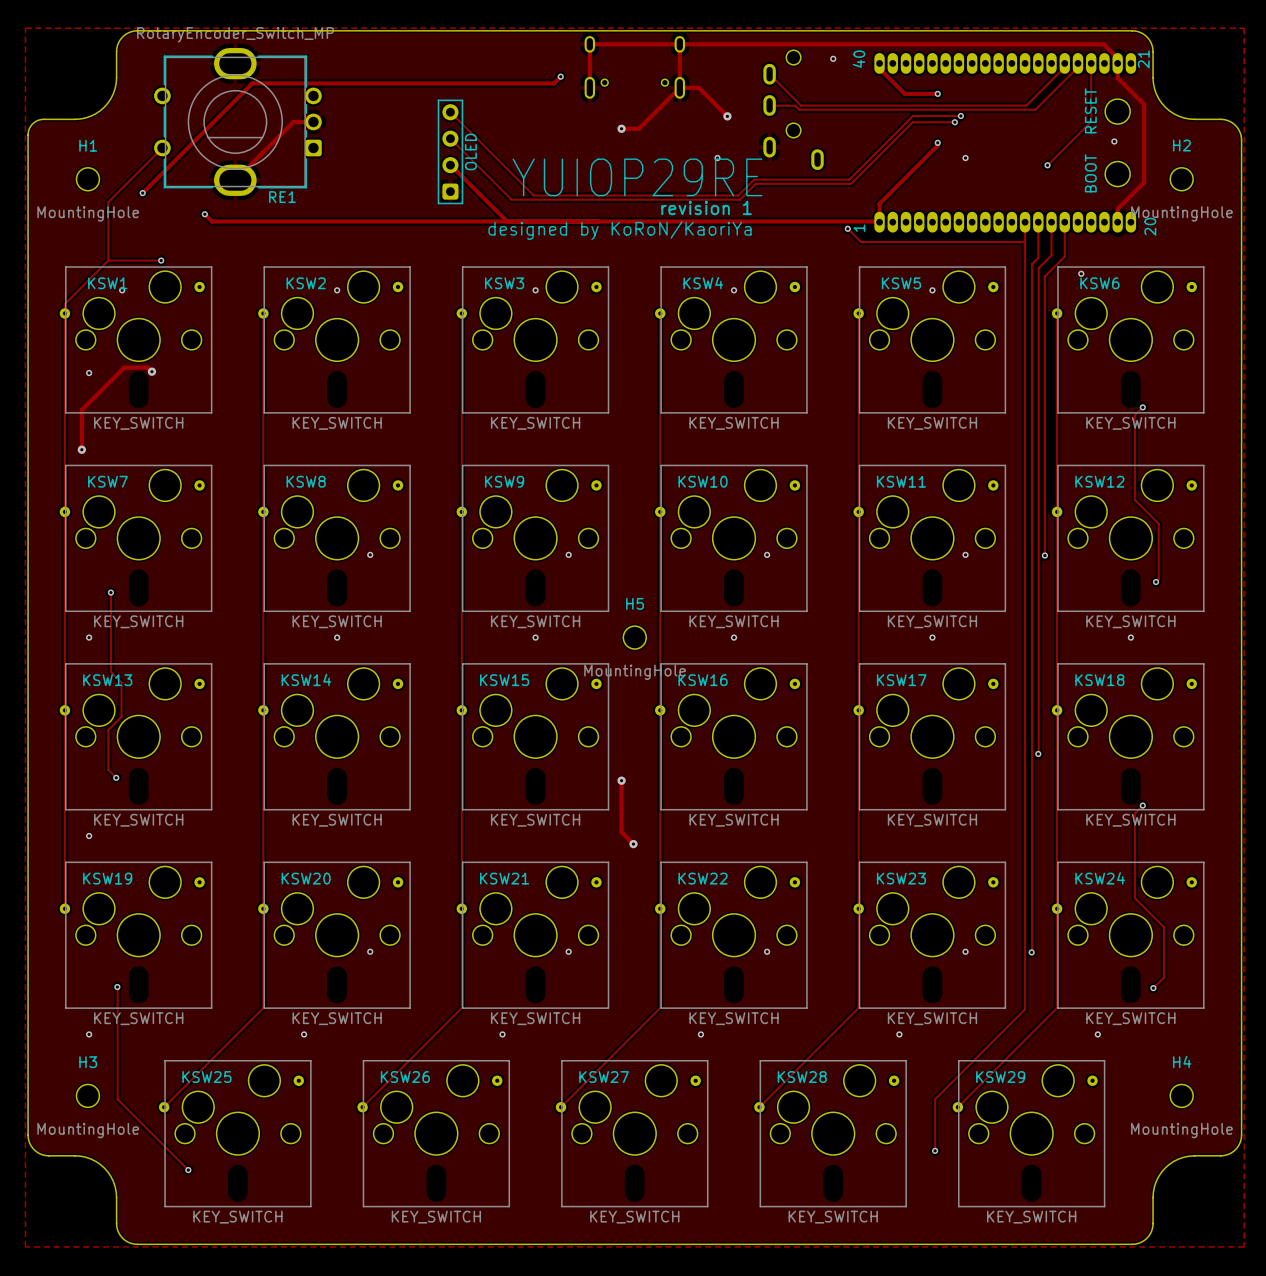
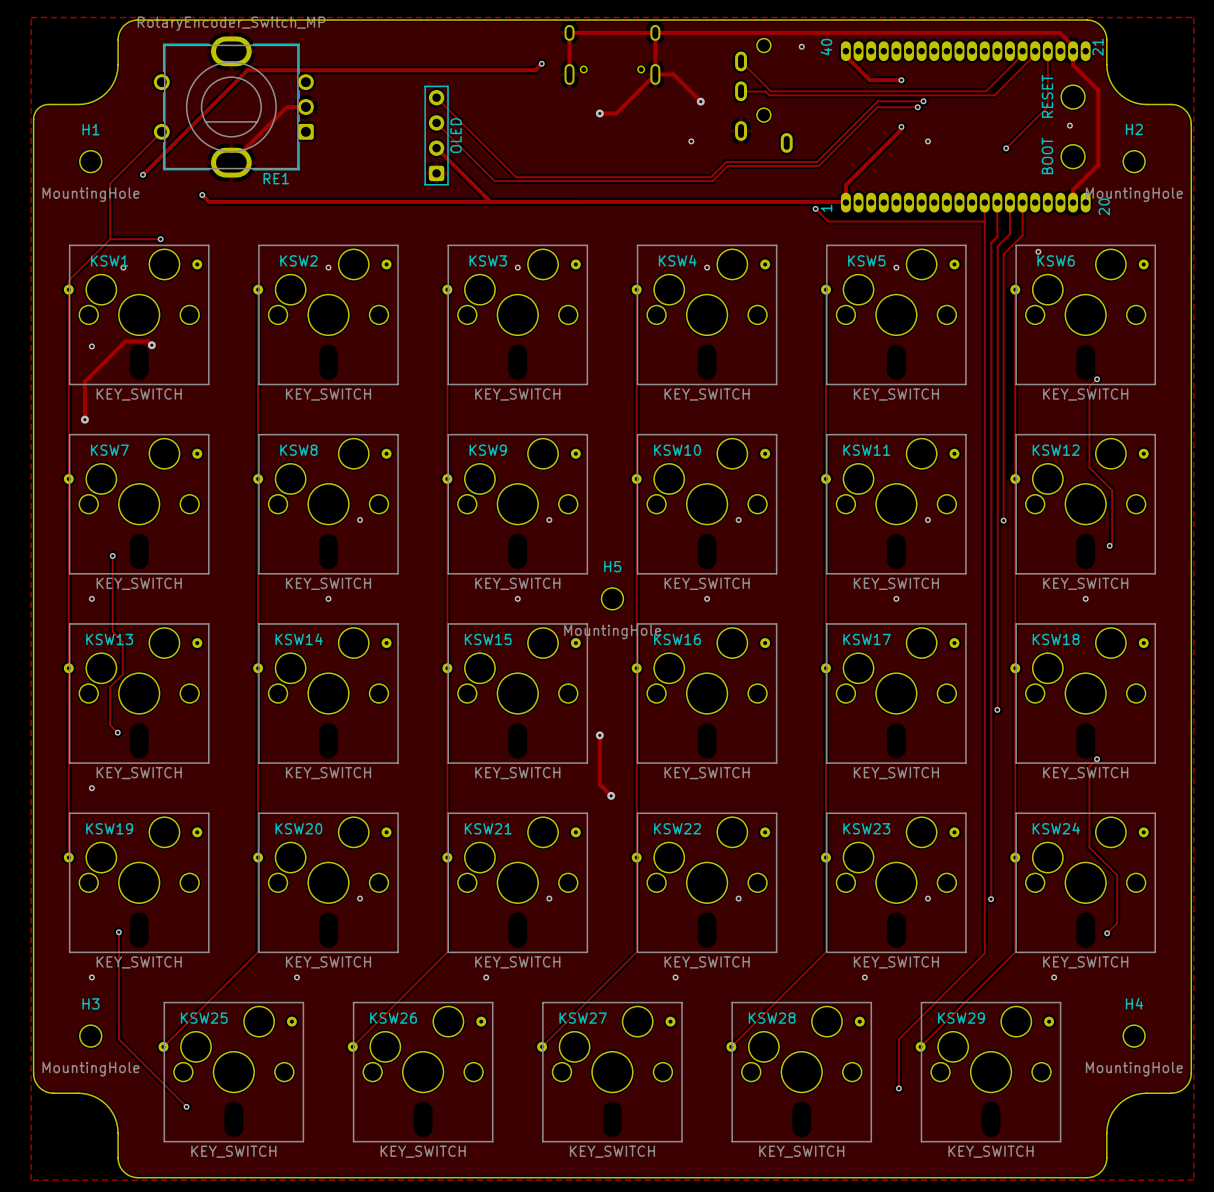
text: YUIOP29RE (637, 177) -> none
text: revision 1 (706, 207) -> none
text: designed by KoRoN/KaoriYa (619, 230) -> none

